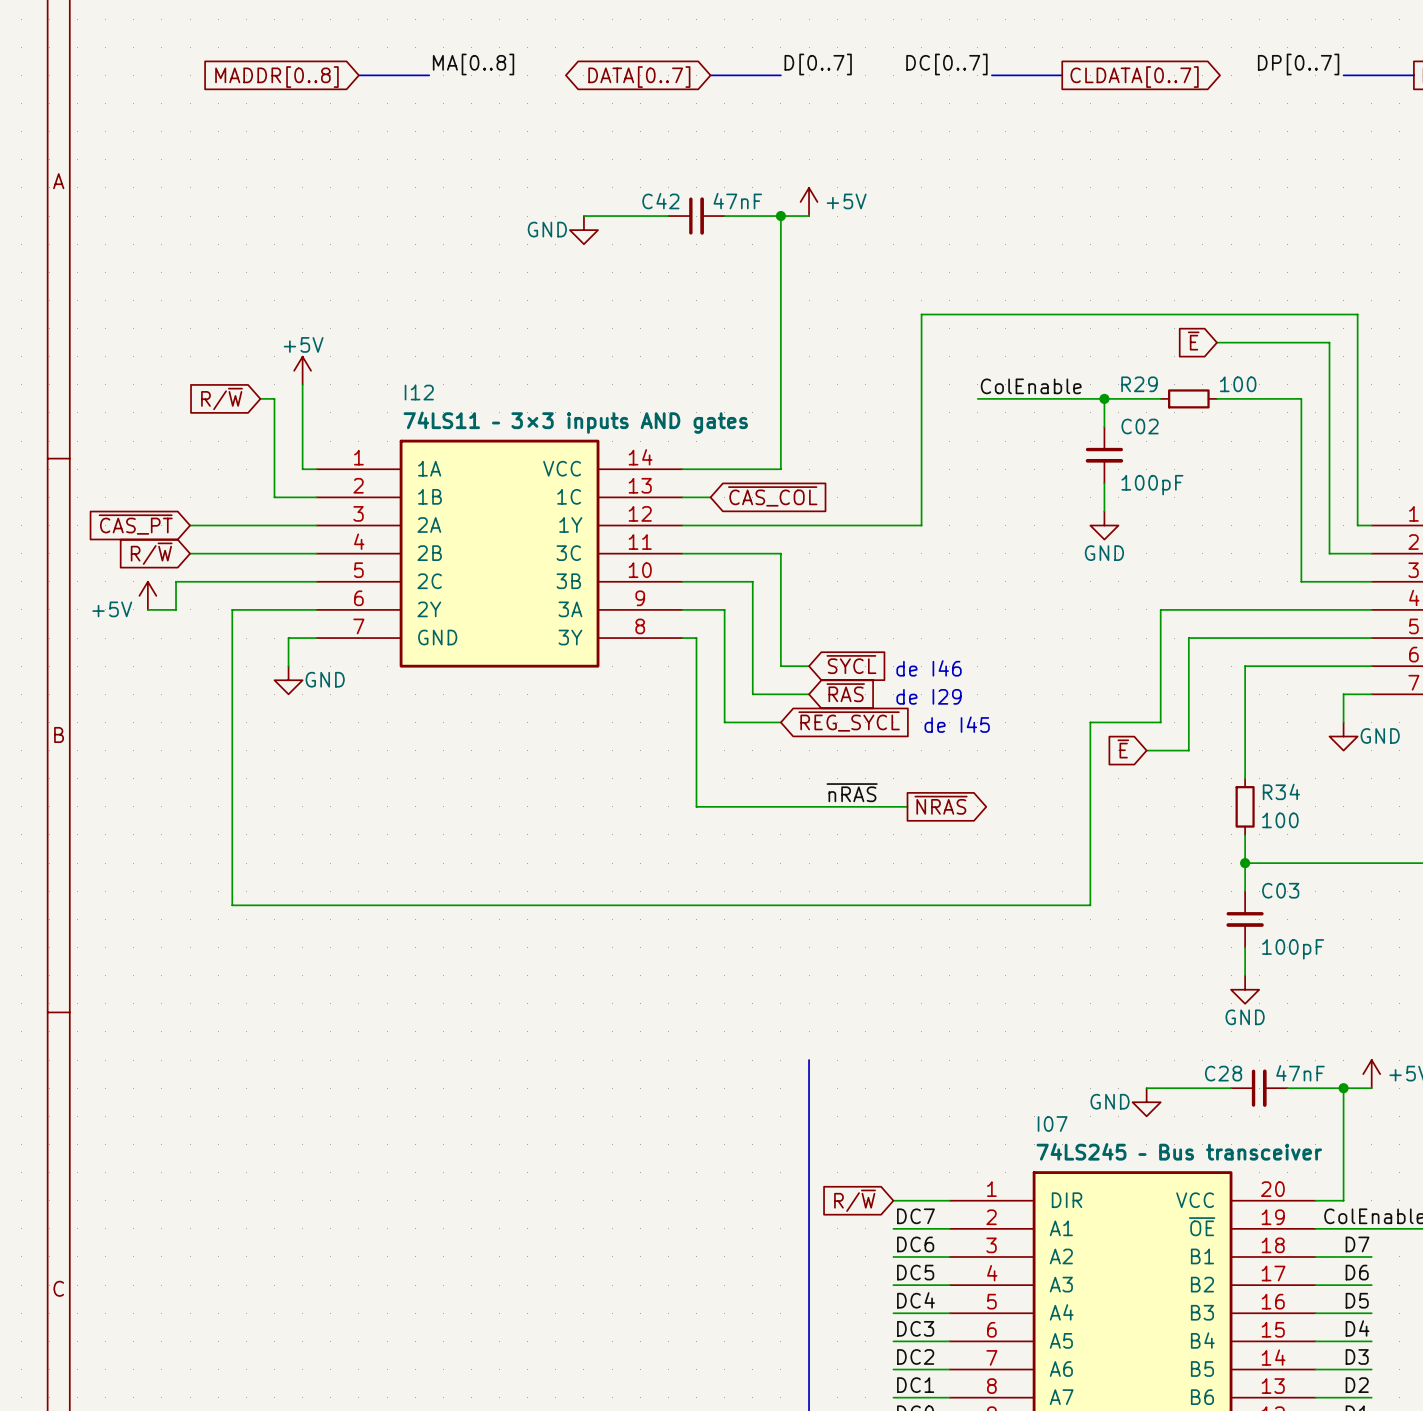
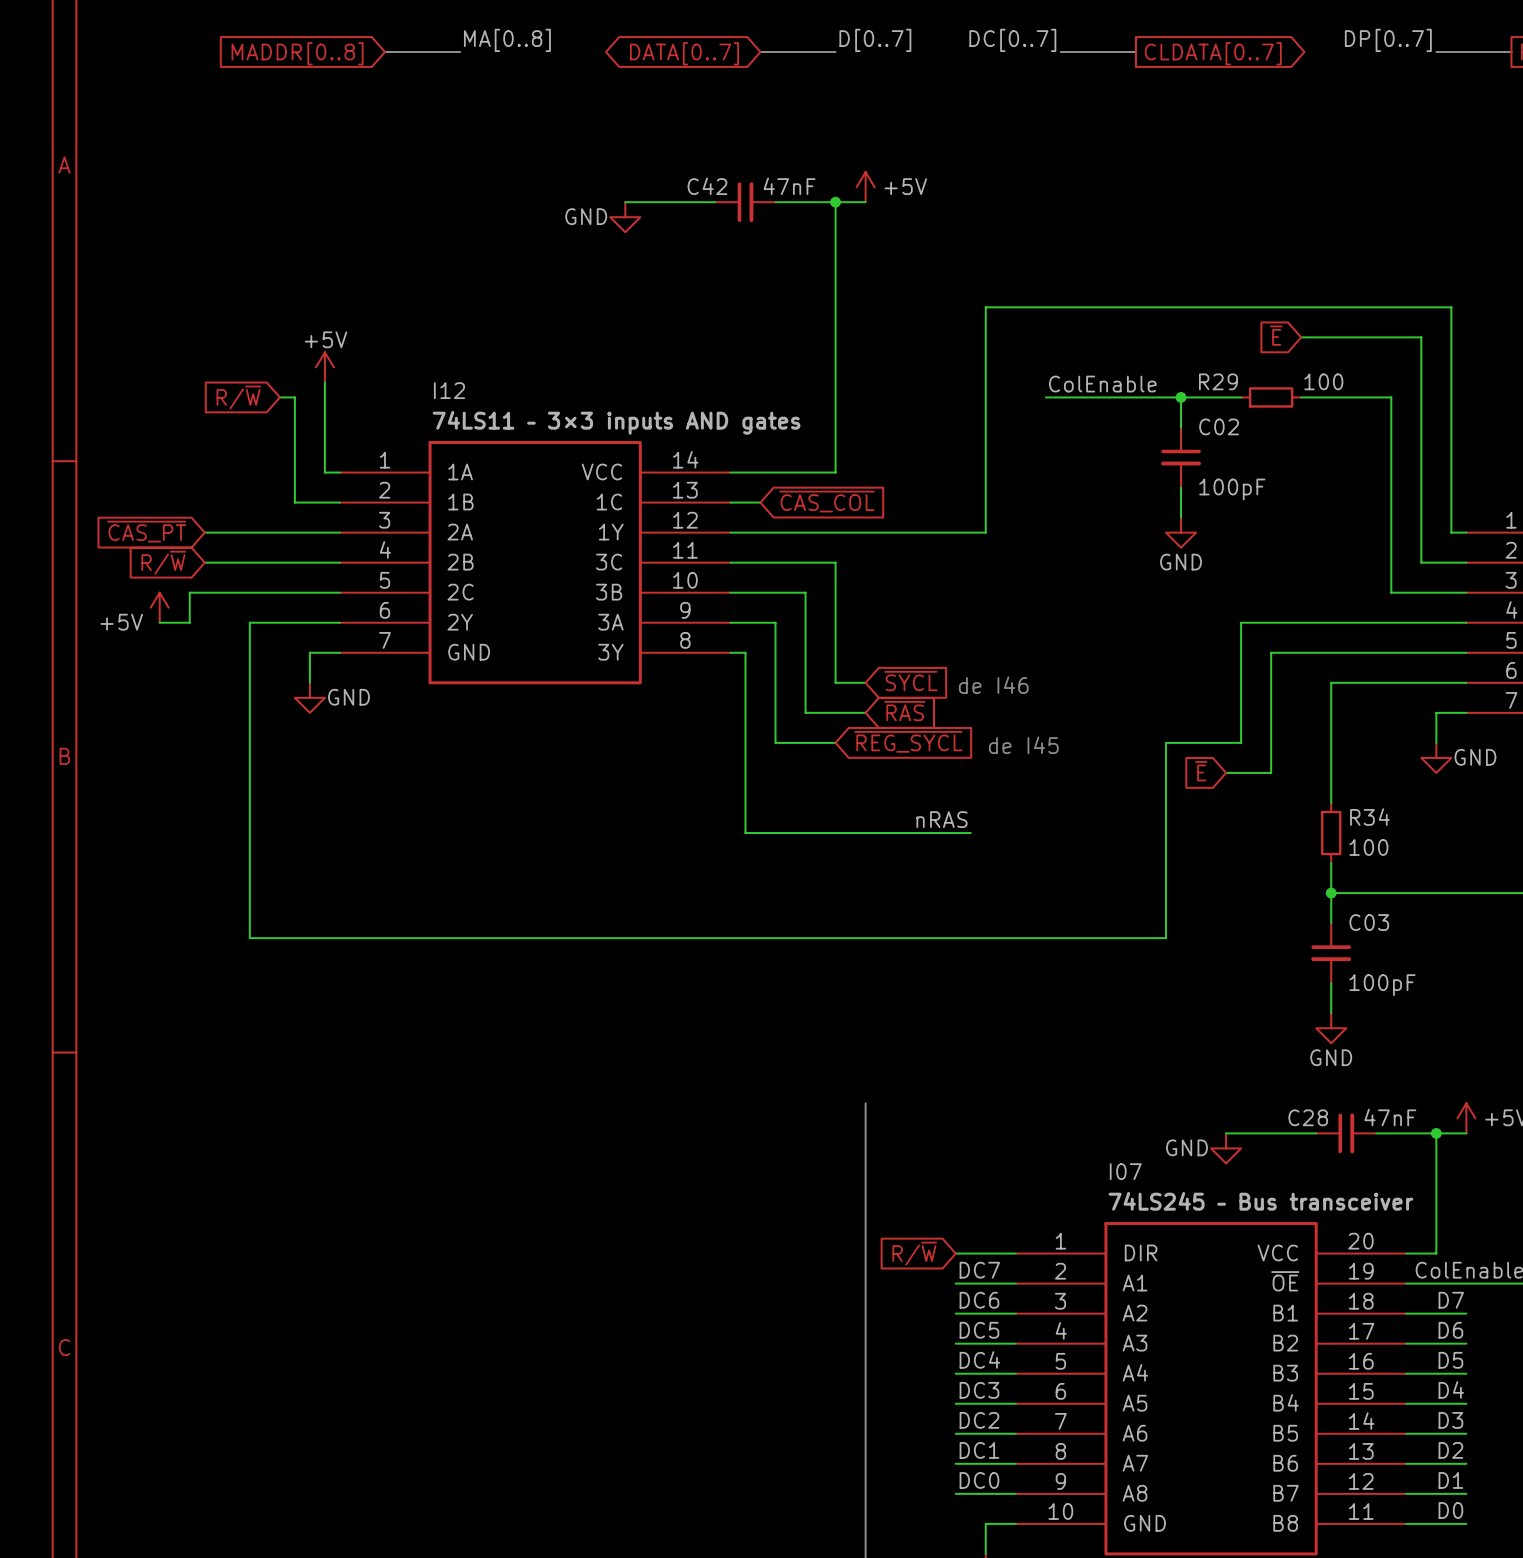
text: de I29 (929, 696) -> none
label: ~{nRAS} (852, 792) -> nRAS (942, 819)
global label: ~{NRAS} (941, 805) -> none

